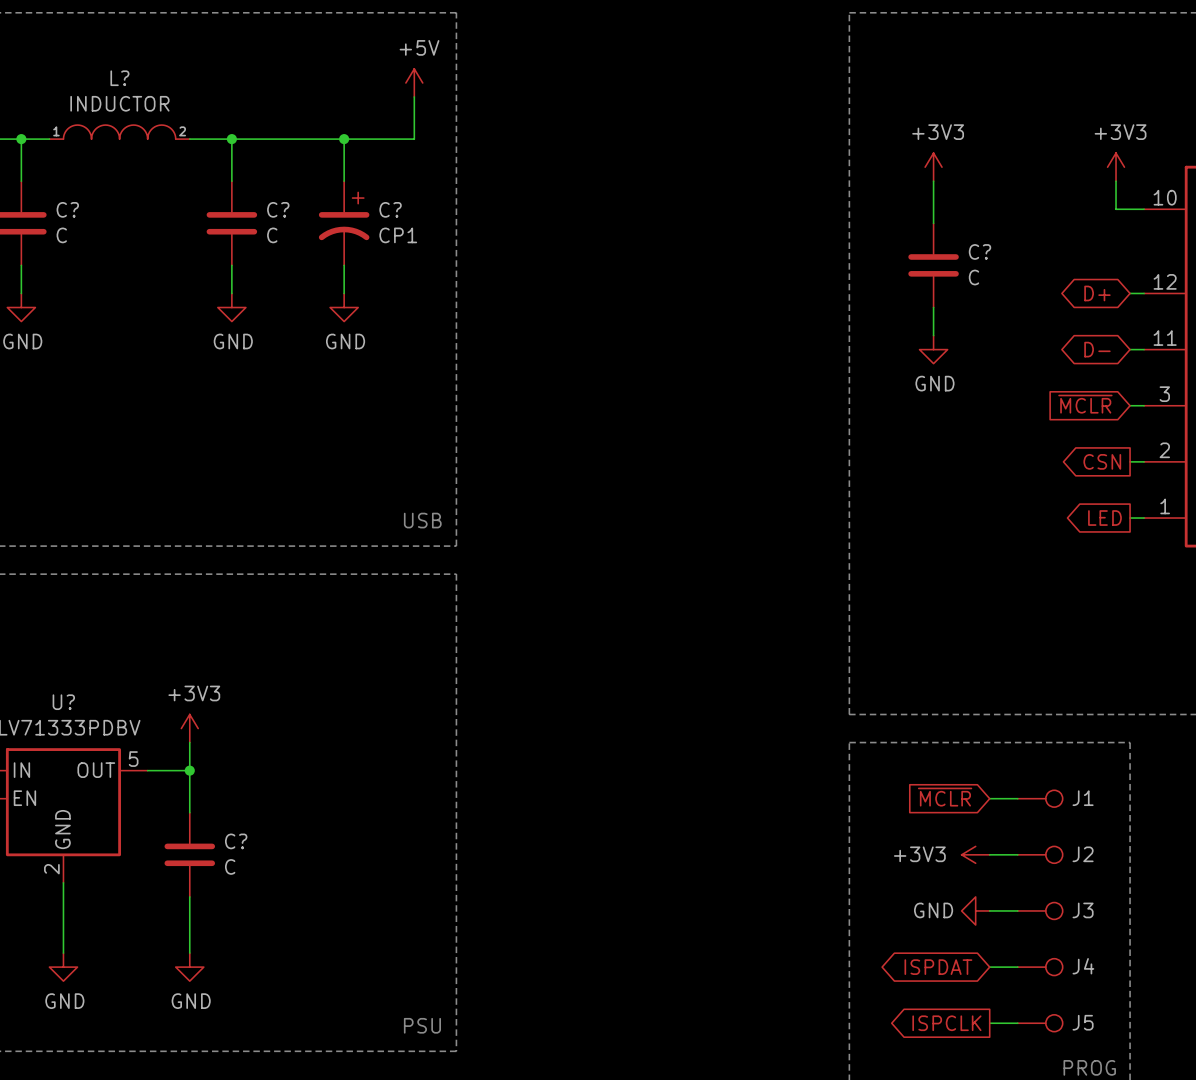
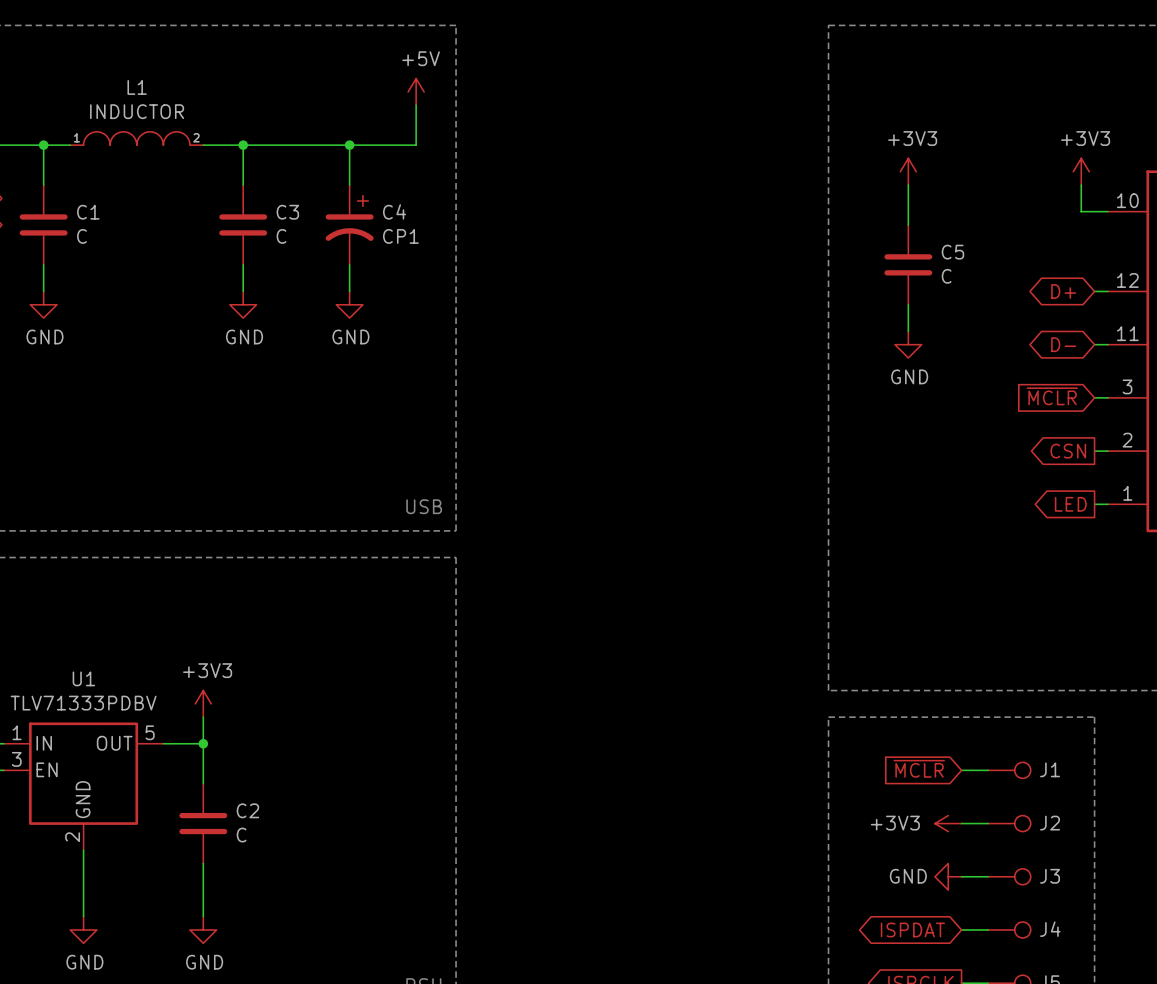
L? name: L? (119, 78) -> L1 (137, 87)
C? name: C? (67, 209) -> C1 (88, 212)
C? name: C? (278, 209) -> C3 (287, 212)
C? name: C? (390, 209) -> C4 (394, 211)
C? name: C? (979, 251) -> C5 (952, 252)
U? name: U? (63, 702) -> U1 (83, 678)
C? name: C? (236, 841) -> C2 (247, 810)

